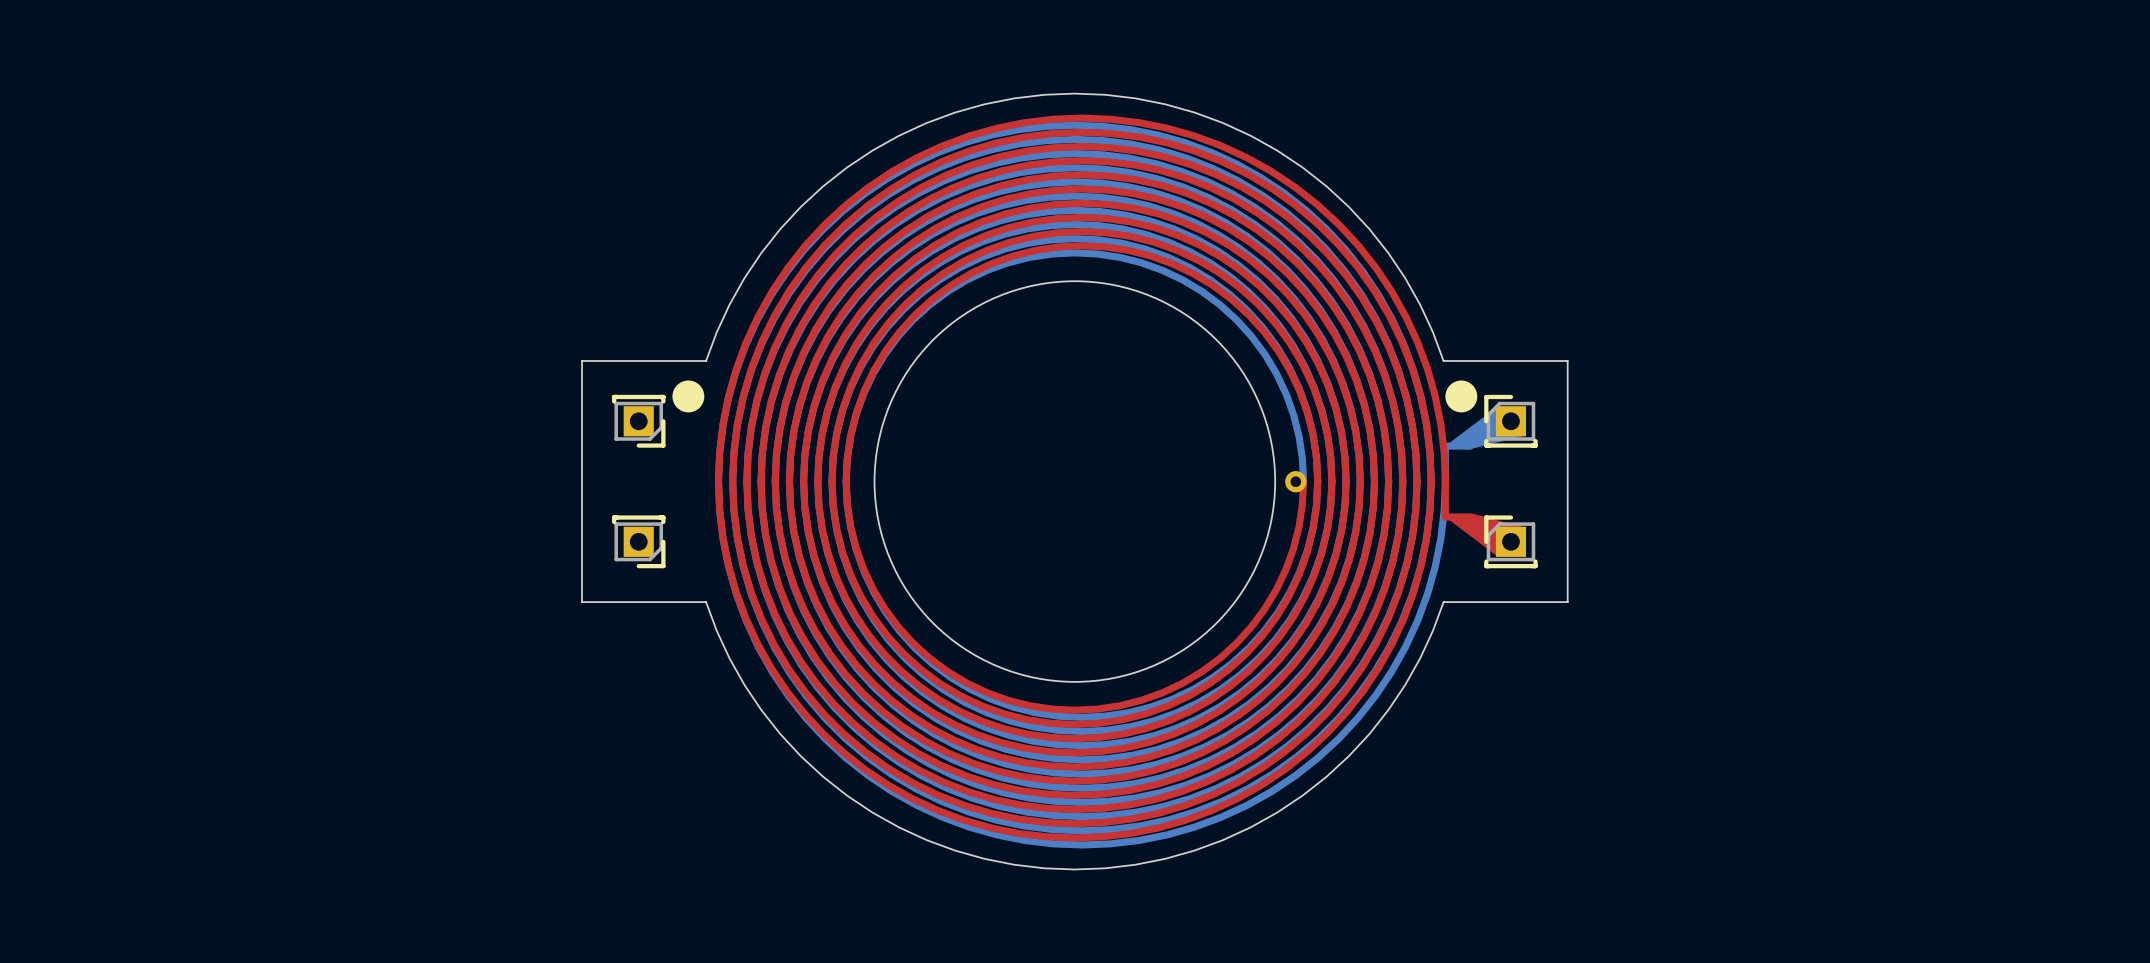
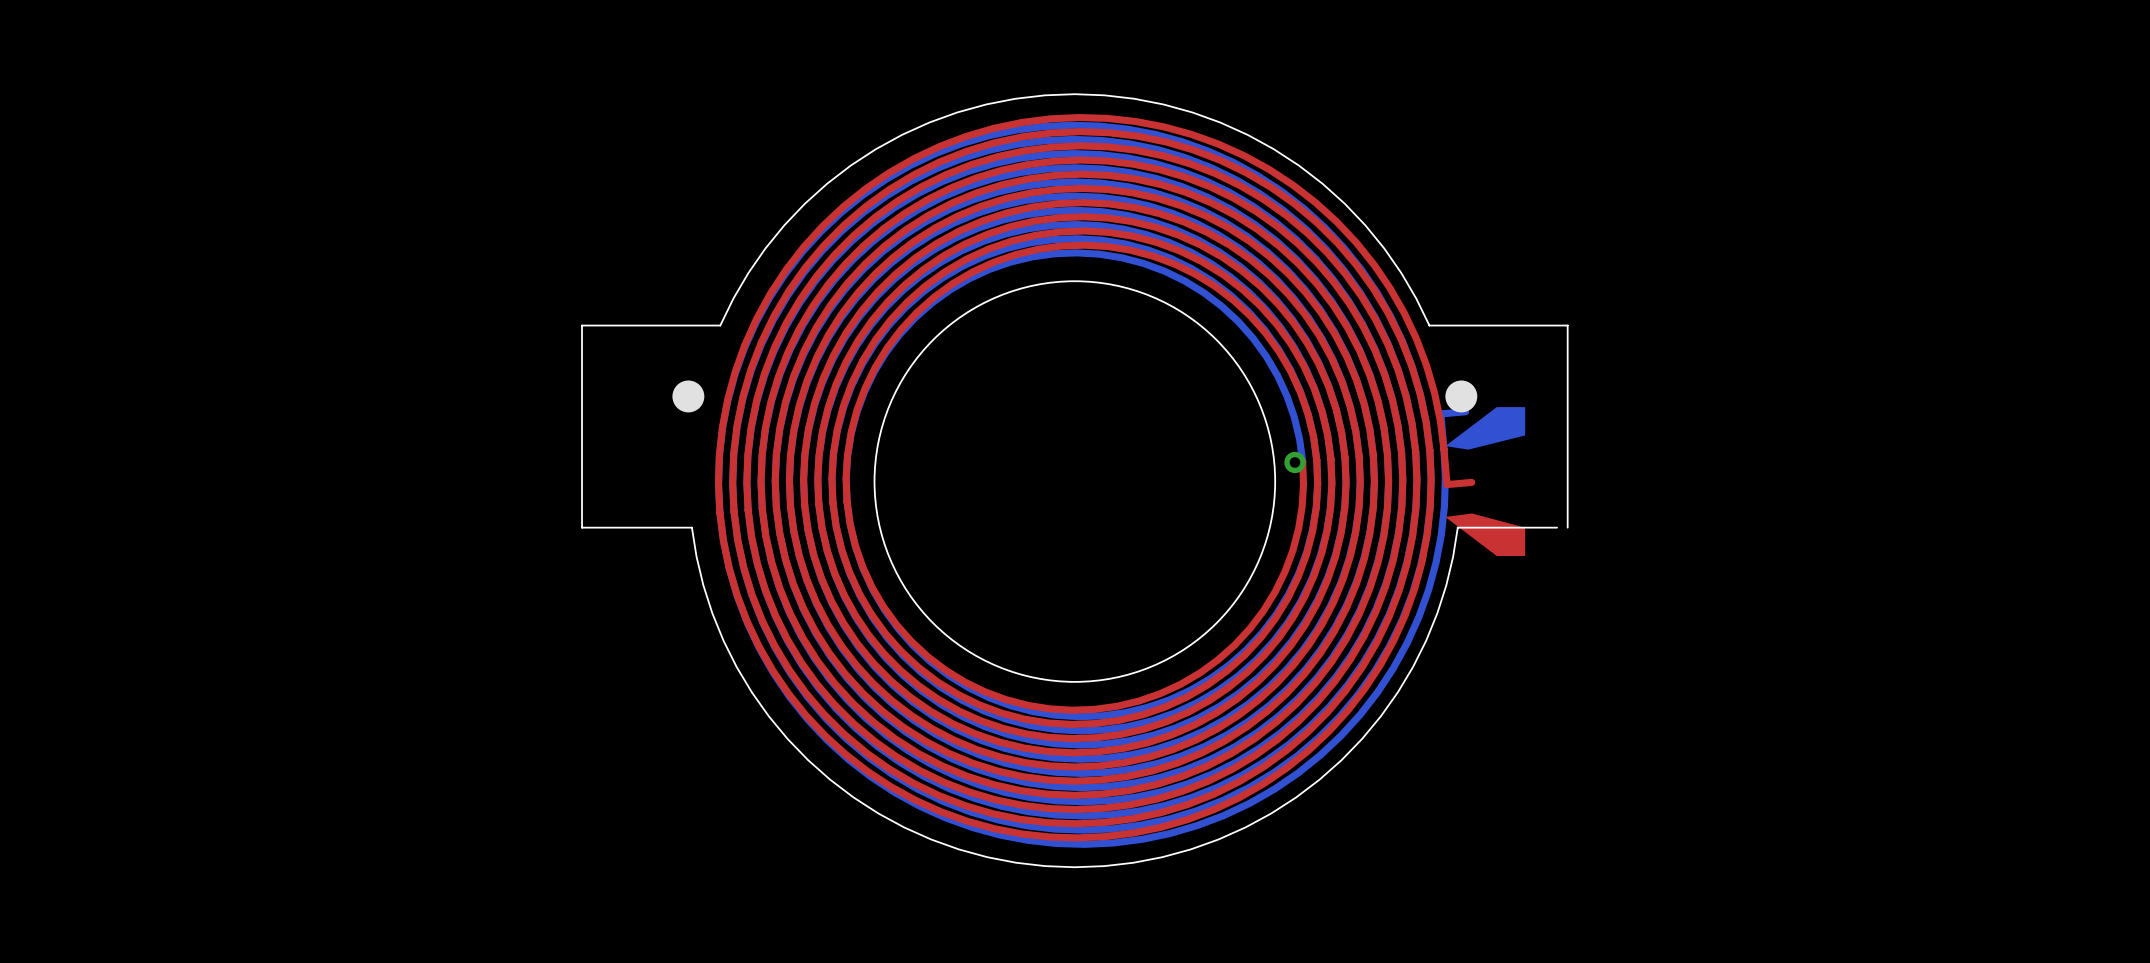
board edge: (582, 361) (706, 361) (729, 304) (761, 253) (800, 206) (847, 167) (898, 135) (955, 112) (1014, 98) (1074, 93) (1135, 98) (1194, 112) (1250, 135) (1302, 167) (1348, 206) (1388, 253) (1420, 304) (1443, 361) (1567, 361) -> (582, 361) (582, 325) (720, 325) (733, 298) (765, 248) (804, 203) (850, 165) (902, 134) (929, 122) (986, 104) (1045, 95) (1074, 94) (1134, 98) (1163, 104) (1192, 112) (1247, 134) (1298, 165) (1344, 203) (1384, 248) (1401, 272) (1429, 325) (1567, 325) (1567, 361)
part: (638, 421) -> none
part: (1510, 421) -> none
part rotation: 0° (1094, 481) -> 5° counterclockwise (1095, 480)
board edge: (582, 527) (582, 602) (706, 602) (729, 658) (761, 710) (800, 756) (847, 795) (898, 827) (955, 850) (1014, 864) (1074, 869) (1135, 864) (1194, 850) (1250, 827) (1302, 795) (1348, 756) (1388, 710) (1420, 658) (1443, 602) (1567, 602) (1567, 527) -> (582, 527) (691, 527) (703, 585) (723, 640) (736, 667) (768, 716) (787, 738) (808, 760) (853, 797) (904, 827) (958, 849) (1016, 862) (1074, 867) (1133, 862) (1190, 849) (1245, 827) (1296, 797) (1341, 760) (1362, 738) (1397, 692) (1426, 640) (1437, 613) (1453, 556) (1457, 527) (1557, 527)
part: (638, 541) -> none
part: (1510, 541) -> none

